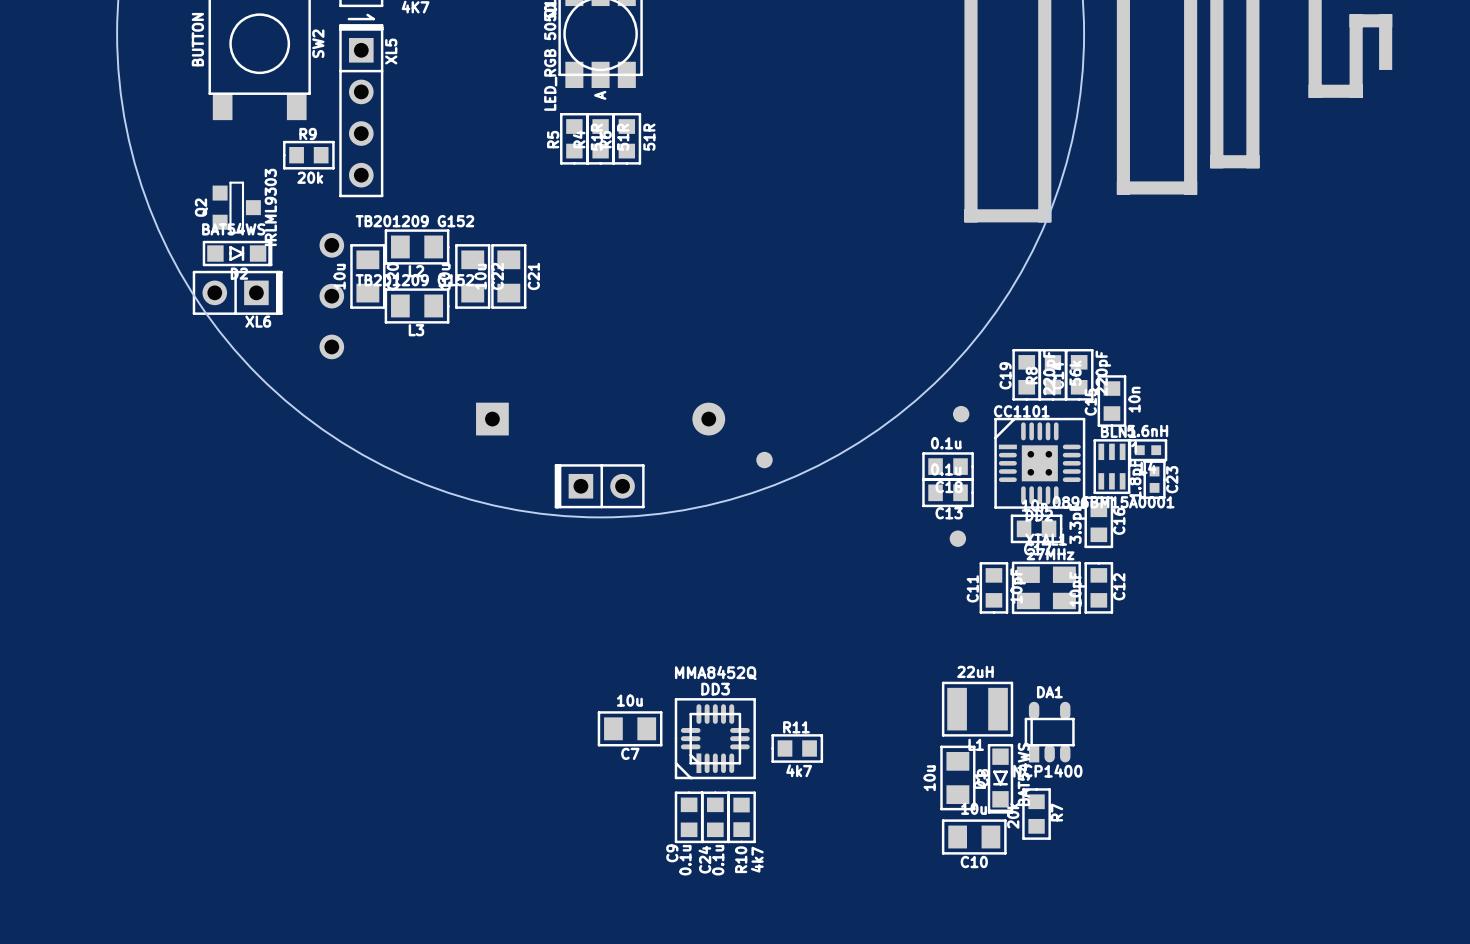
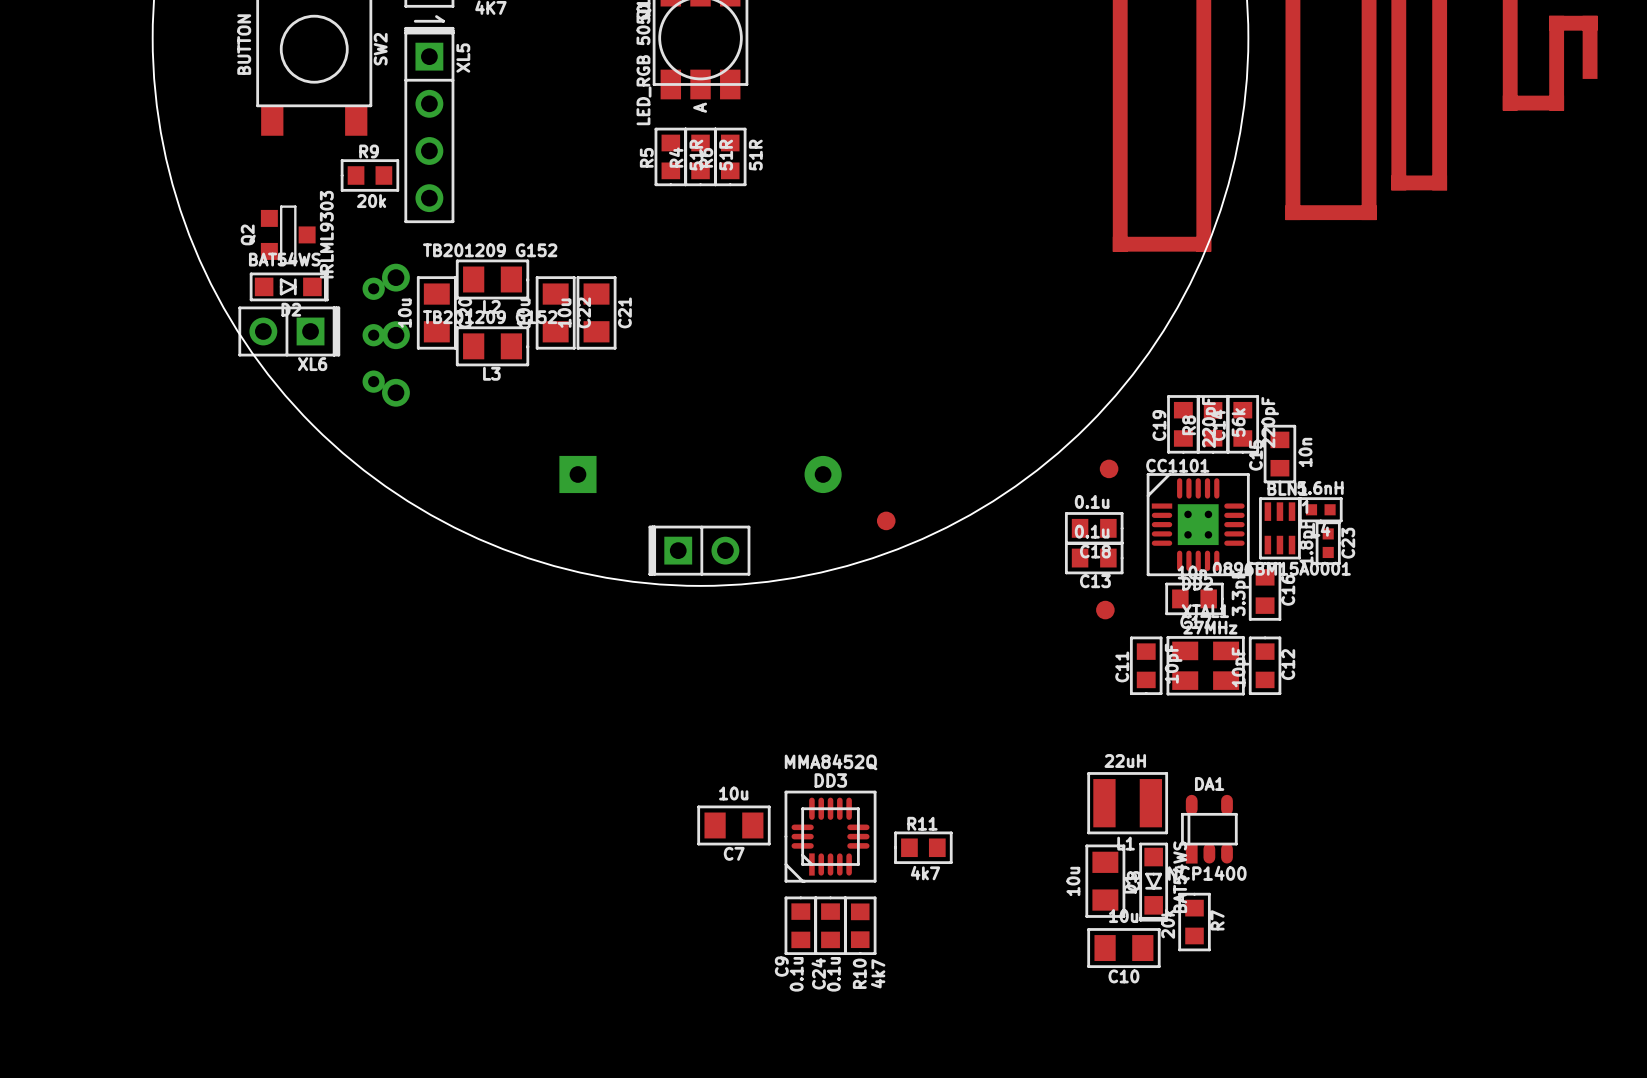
part: none -> (373, 335)

